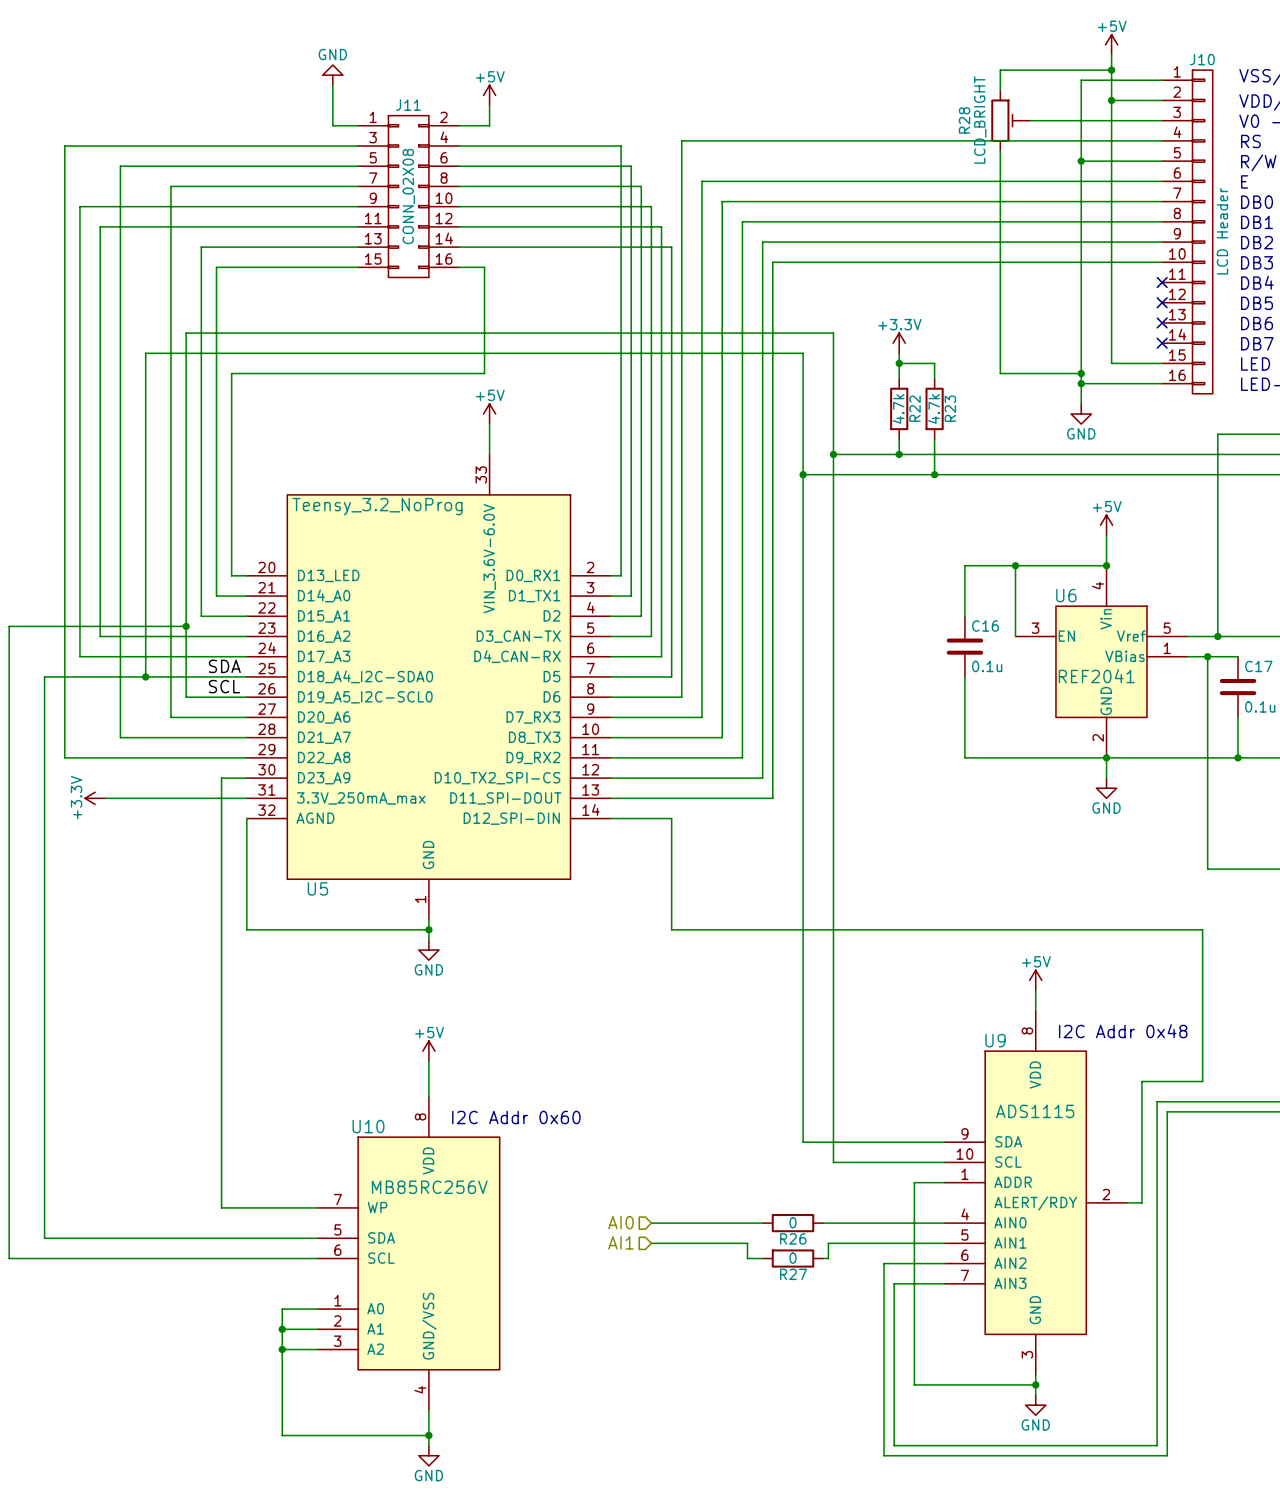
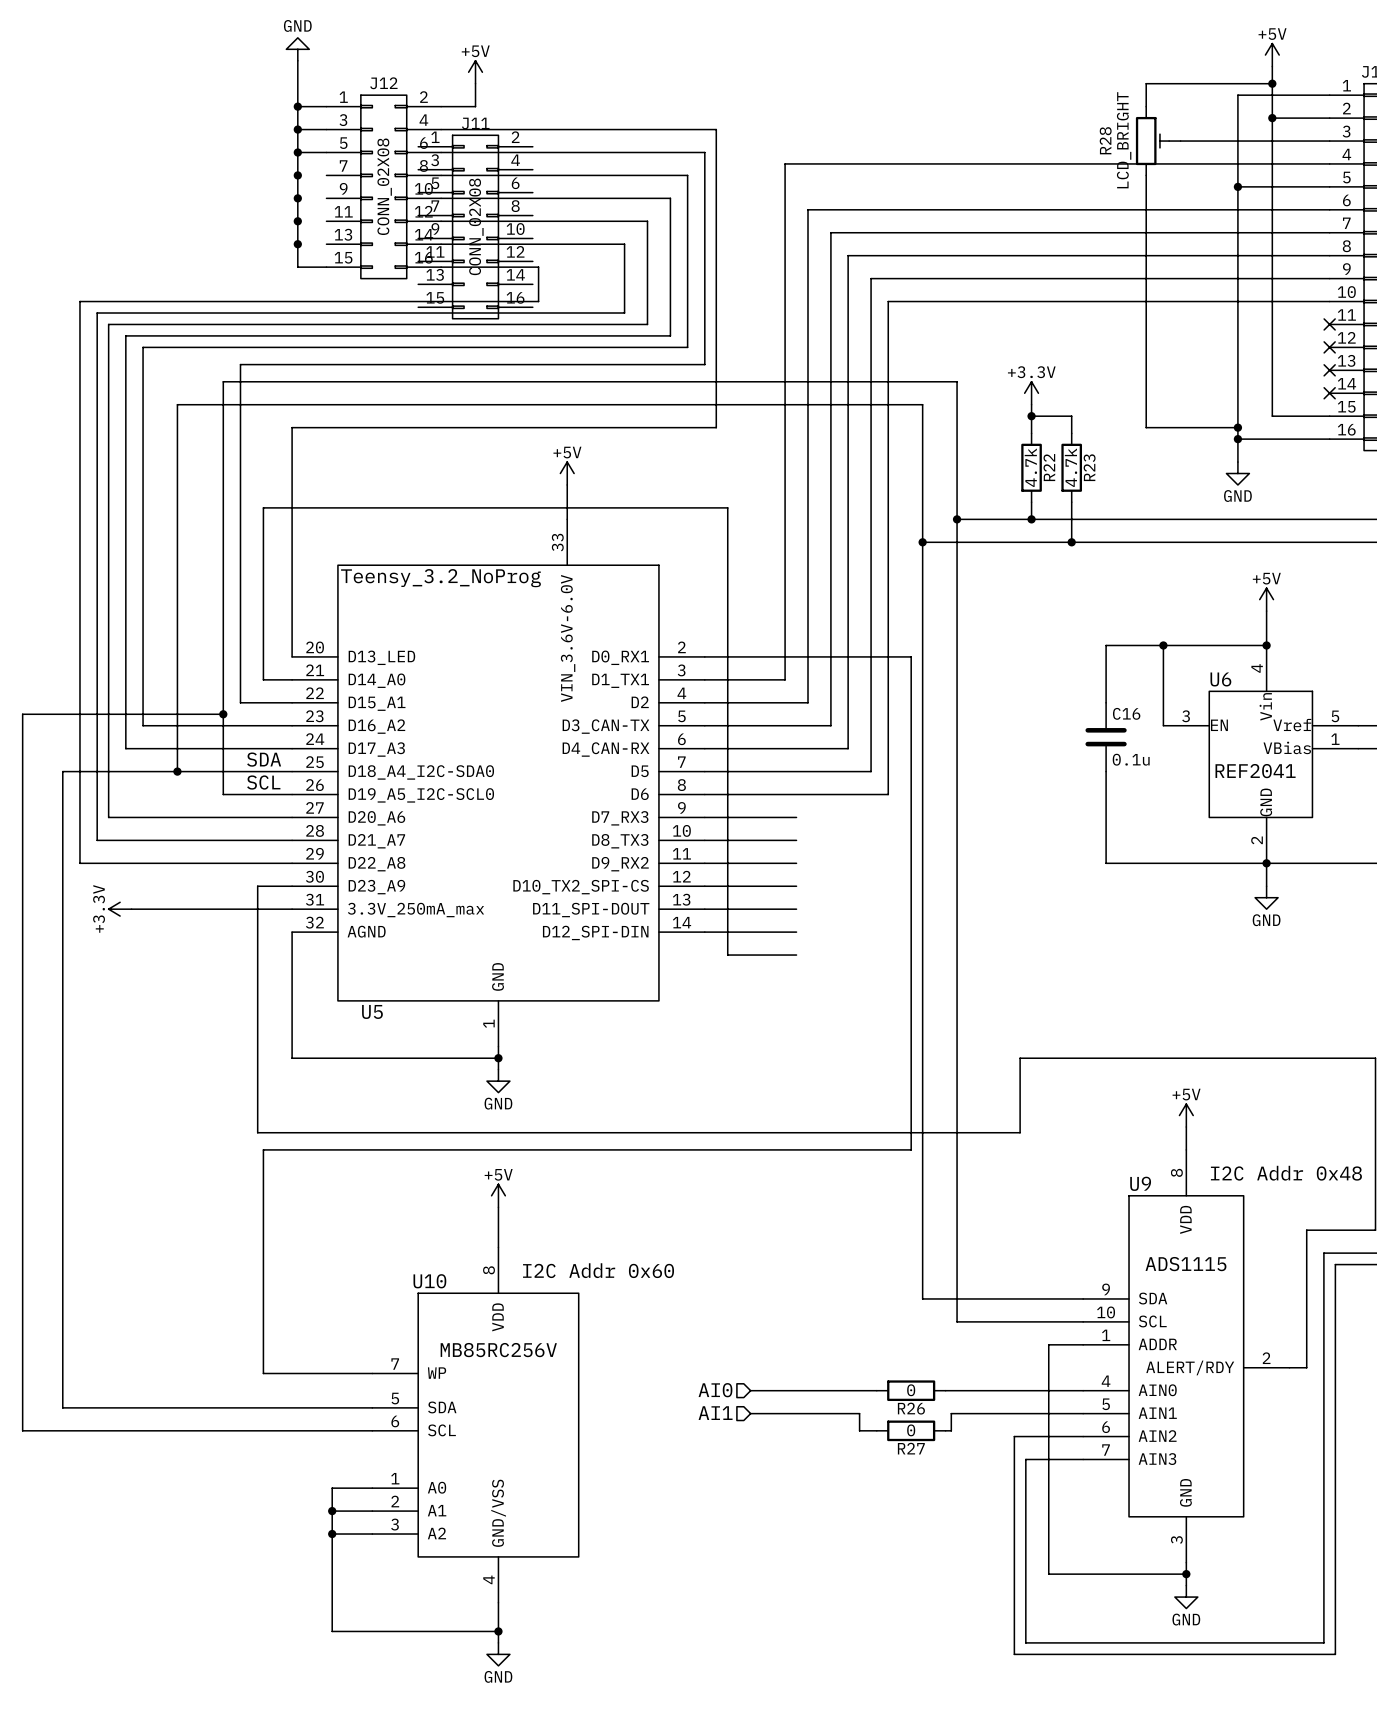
wire: none -> (297, 60) (297, 267) (326, 267)
power symbol position: GND (332, 75) -> GND (297, 49)
wire: (332, 85) (332, 125) (358, 125) -> none
wire: none -> (297, 106) (326, 106)
junction: none -> (297, 106)
power symbol position: +5V (489, 95) -> +5V (475, 72)
wire: (489, 105) (489, 125) (459, 125) -> (475, 83) (475, 106) (441, 106)
wire: none -> (297, 129) (326, 129)
junction: none -> (297, 129)
wire: none -> (297, 152) (326, 152)
junction: none -> (297, 152)
wire: (358, 145) (64, 145) (64, 757) -> (441, 267) (538, 267) (538, 301) (79, 301) (79, 863) (85, 863)
wire: (459, 145) (621, 145) -> (441, 129) (716, 129) (716, 169)
junction: none -> (297, 175)
wire: none -> (441, 175) (687, 175) (687, 347) (143, 347) (143, 725)
J12: none -> CONN_02X08 (383, 186)
wire: (358, 166) (120, 166) (120, 737) -> (441, 244) (624, 244) (624, 313) (97, 313) (97, 840) (148, 840)
wire: (459, 166) (631, 166) (631, 444) -> none
junction: none -> (297, 198)
wire: (358, 186) (170, 186) (170, 717) -> (441, 221) (647, 221) (647, 324) (108, 324) (108, 817) (206, 817)
wire: (459, 186) (641, 186) (641, 616) -> none
junction: none -> (297, 221)
wire: (358, 206) (79, 206) (79, 656) (100, 656) -> none
wire: (459, 206) (651, 206) (651, 636) -> none
junction: none -> (297, 244)
wire: (742, 221) (742, 757) (691, 757) -> (853, 255) (848, 255) (848, 748) (762, 748)
wire: (358, 226) (100, 226) (100, 292) -> (441, 198) (670, 198) (670, 335) (125, 335)
wire: (459, 226) (661, 226) (661, 656) -> none
wire: (762, 242) (762, 778) (691, 778) -> (876, 278) (871, 278) (871, 771) (773, 771)
wire: (358, 247) (201, 247) (201, 317) -> (441, 152) (704, 152) (704, 364) (240, 364)
wire: (459, 247) (671, 247) (671, 676) -> none
wire: (358, 267) (216, 267) (216, 596) (221, 596) -> (727, 507) (263, 507) (263, 679)
wire: (459, 267) (484, 267) (484, 373) -> (716, 427) (561, 427)
wire: (246, 373) (231, 373) (231, 575) (246, 575) -> (292, 427) (292, 656)
wire: (621, 373) (621, 575) -> none
wire: (681, 596) (681, 697) -> (785, 679) (727, 679) (727, 955) (796, 955)
wire: (701, 616) (701, 717) (691, 717) -> (808, 702) (739, 702)
wire: (100, 636) (115, 636) -> (125, 725) (125, 748)
wire: (722, 636) (722, 737) (691, 737) -> (830, 725) (750, 725)
wire: (772, 697) (772, 798) (691, 798) -> (888, 794) (785, 794)
wire: (221, 778) (221, 1010) -> (716, 656) (911, 656) (911, 1149) (263, 1149)
wire: none -> (263, 886) (257, 886) (257, 1132) (1020, 1132) (1020, 1058)
wire: (671, 818) (671, 929) (889, 929) -> (773, 932) (796, 932)

